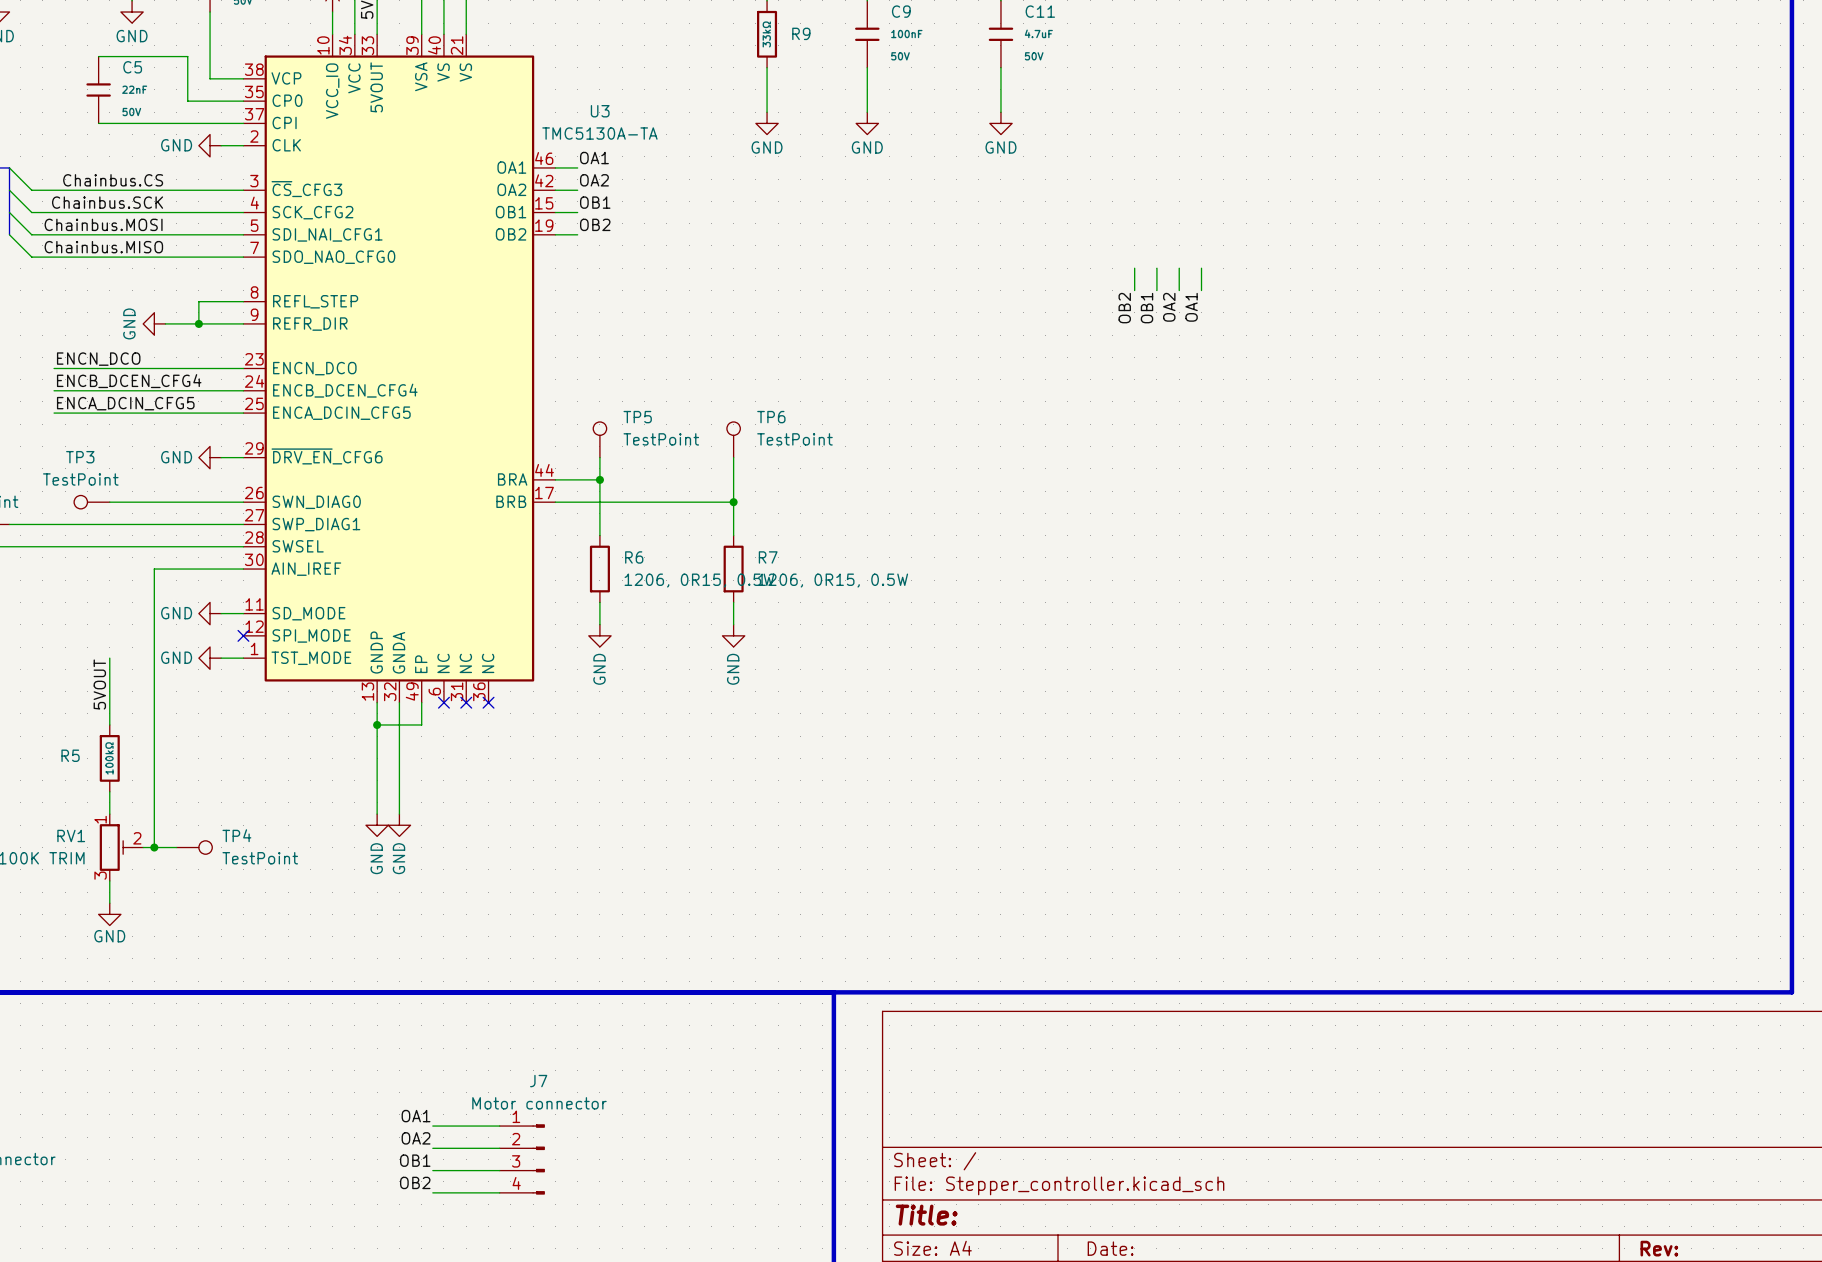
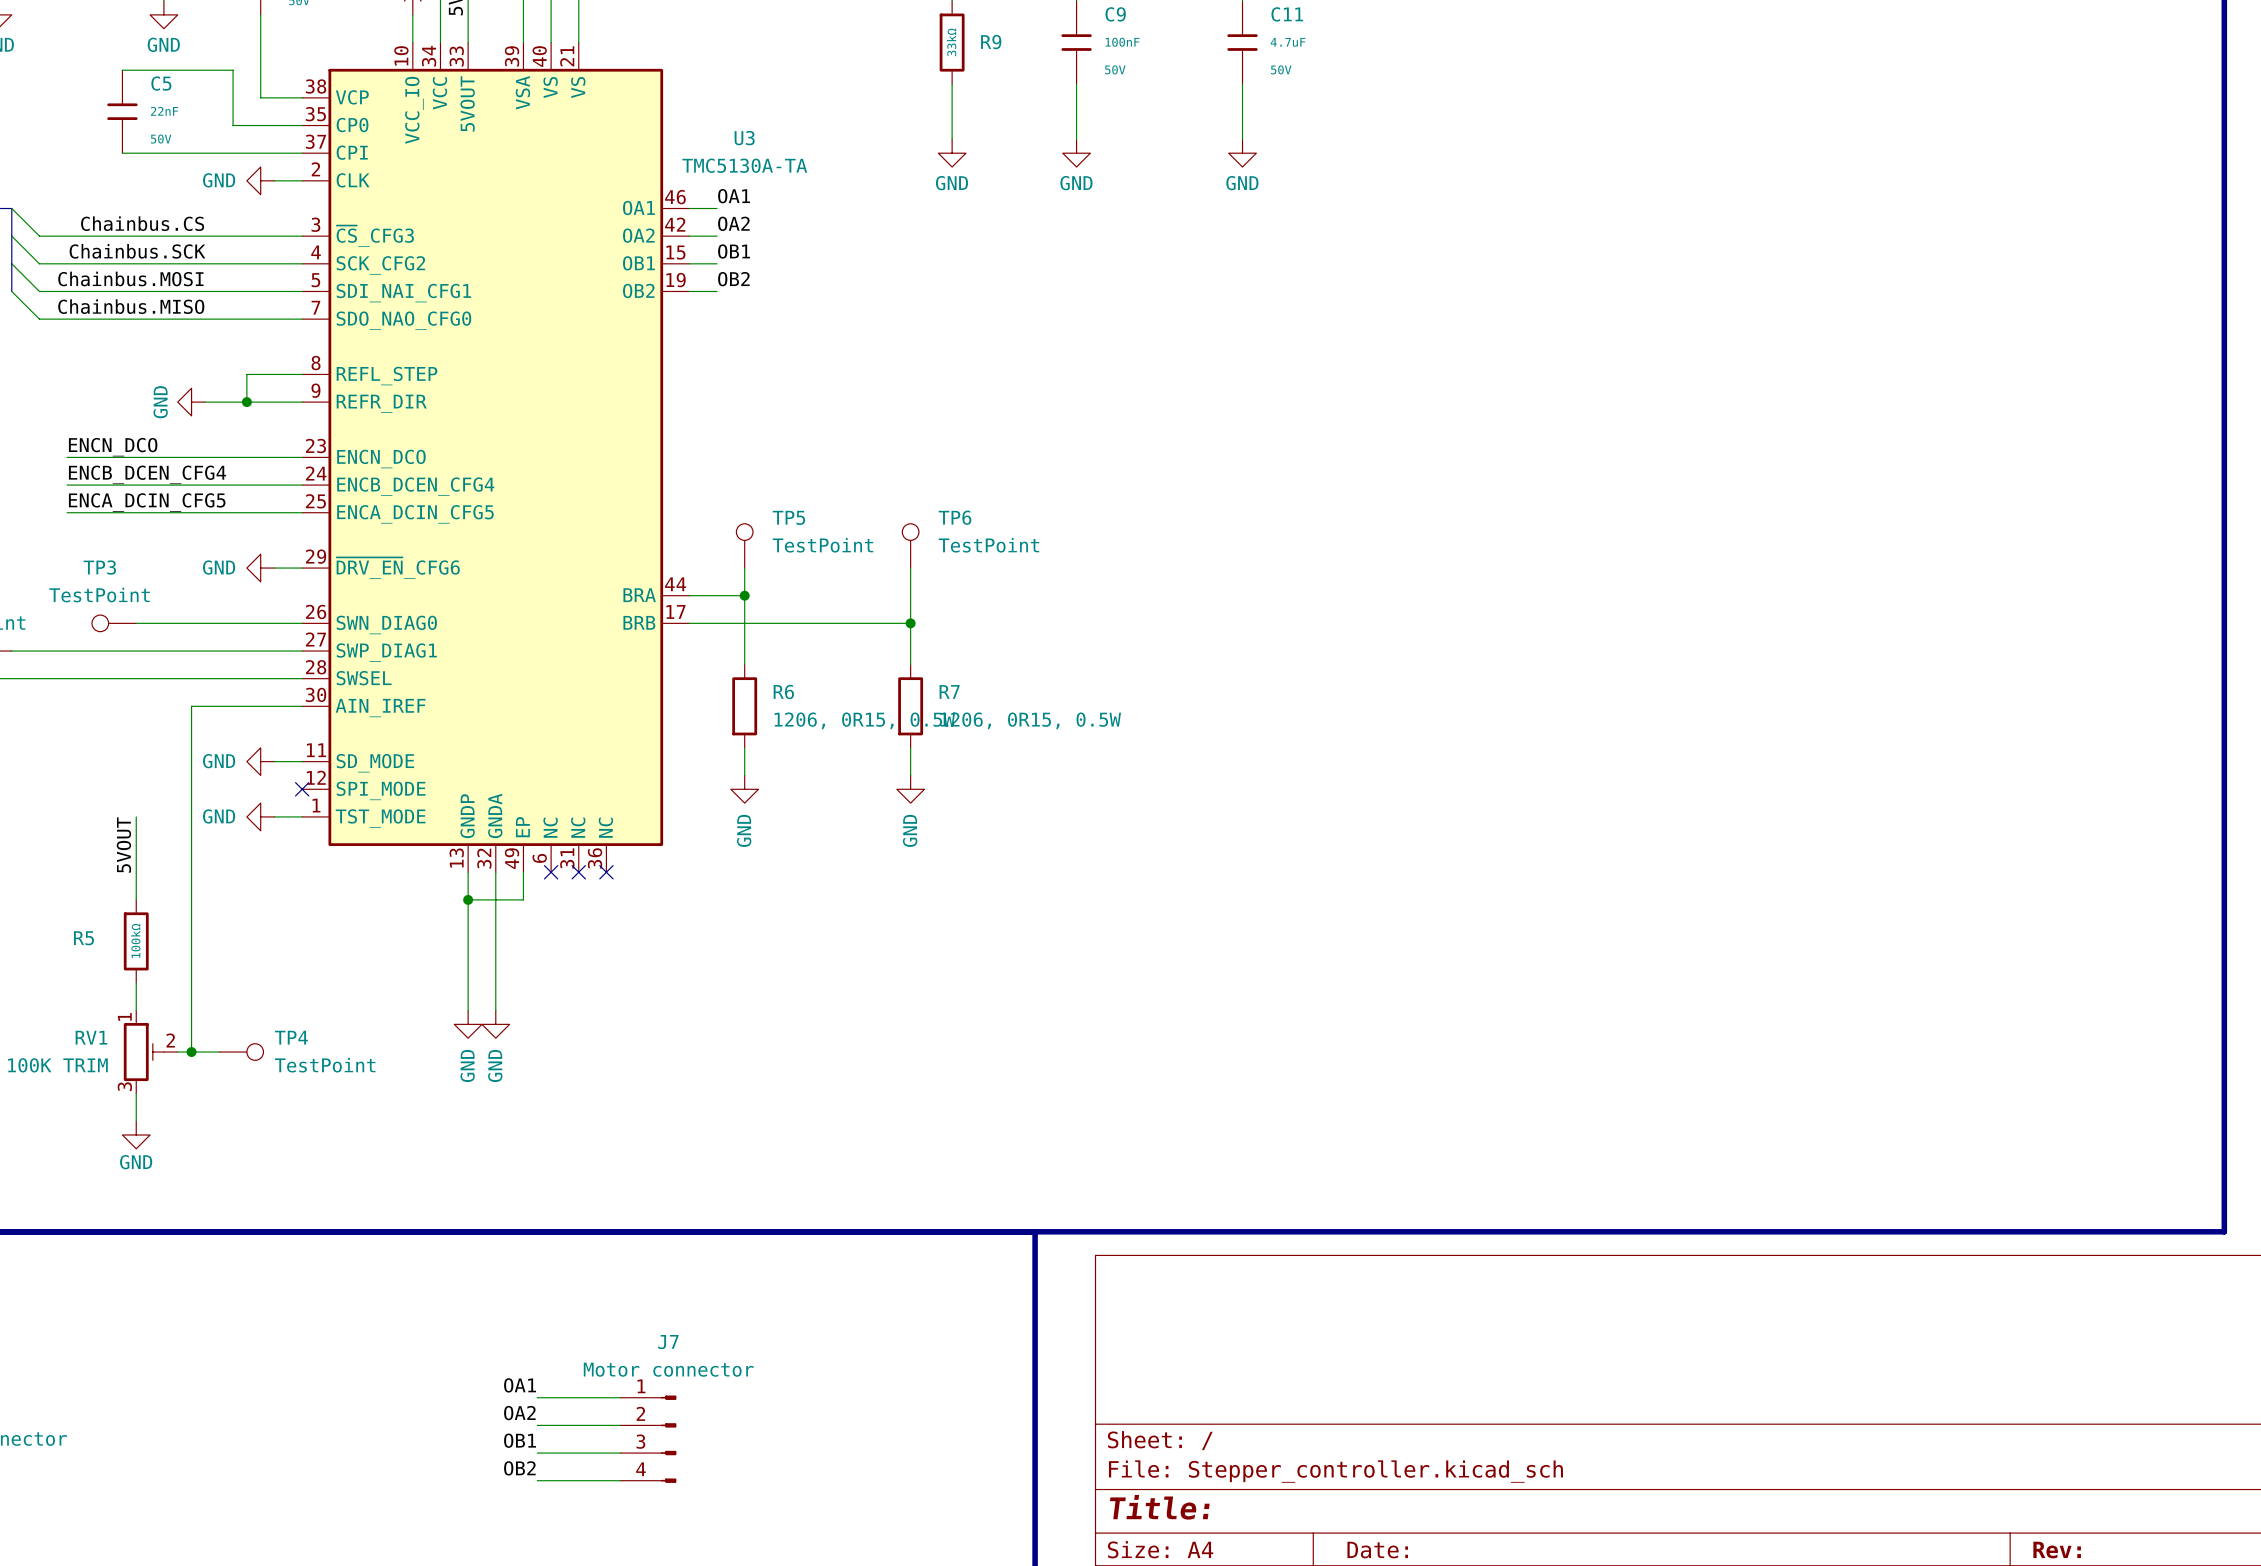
wire: (1134, 268) (1134, 290) -> none
wire: (1156, 268) (1156, 290) -> none
wire: (1179, 268) (1179, 290) -> none
wire: (1201, 268) (1201, 290) -> none
label: OA2 (1169, 307) -> none
label: OA1 (1191, 307) -> none
label: OB2 (1124, 308) -> none
label: OB1 (1147, 308) -> none

